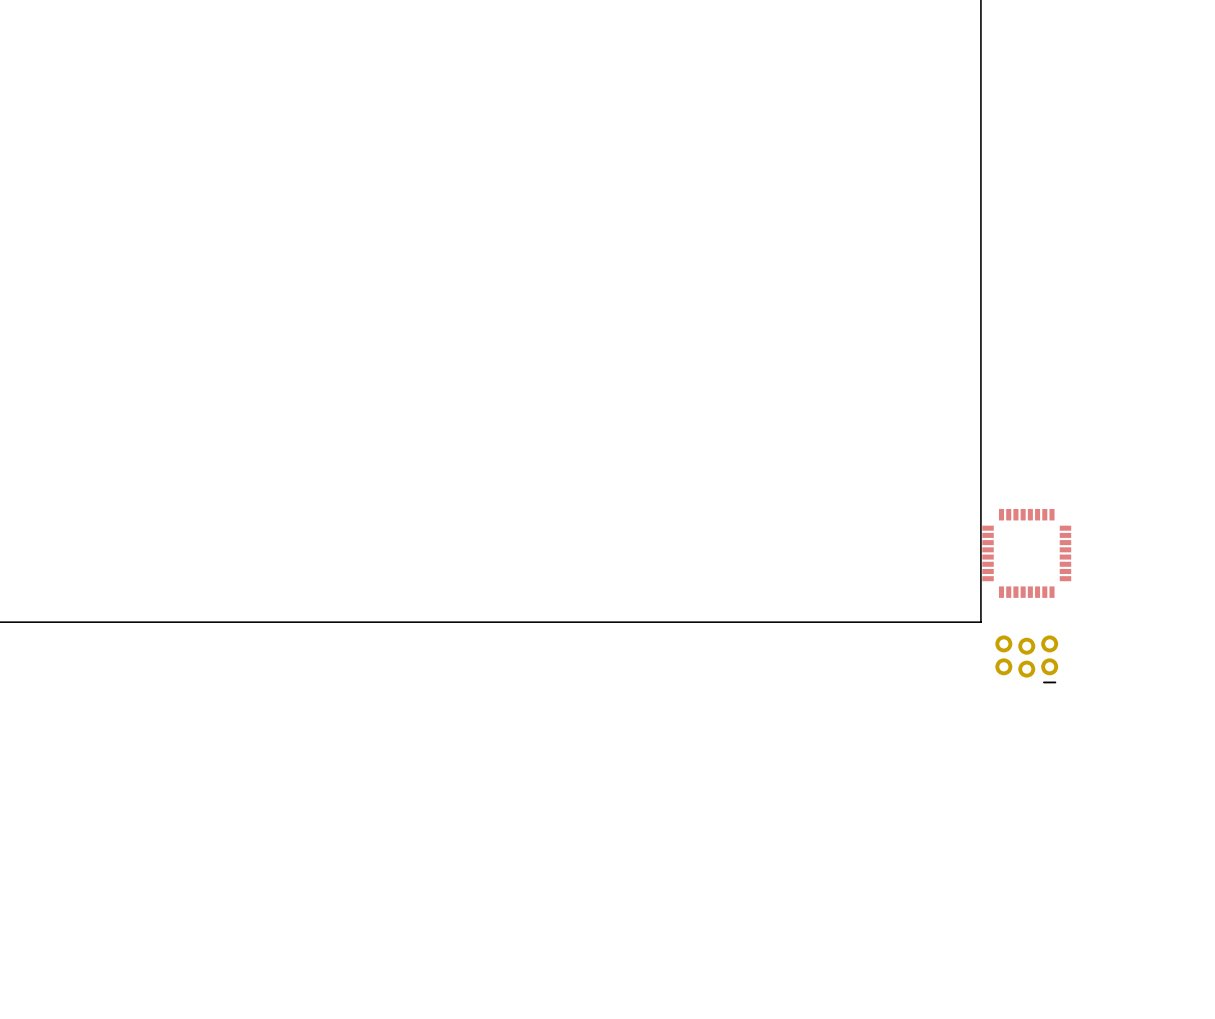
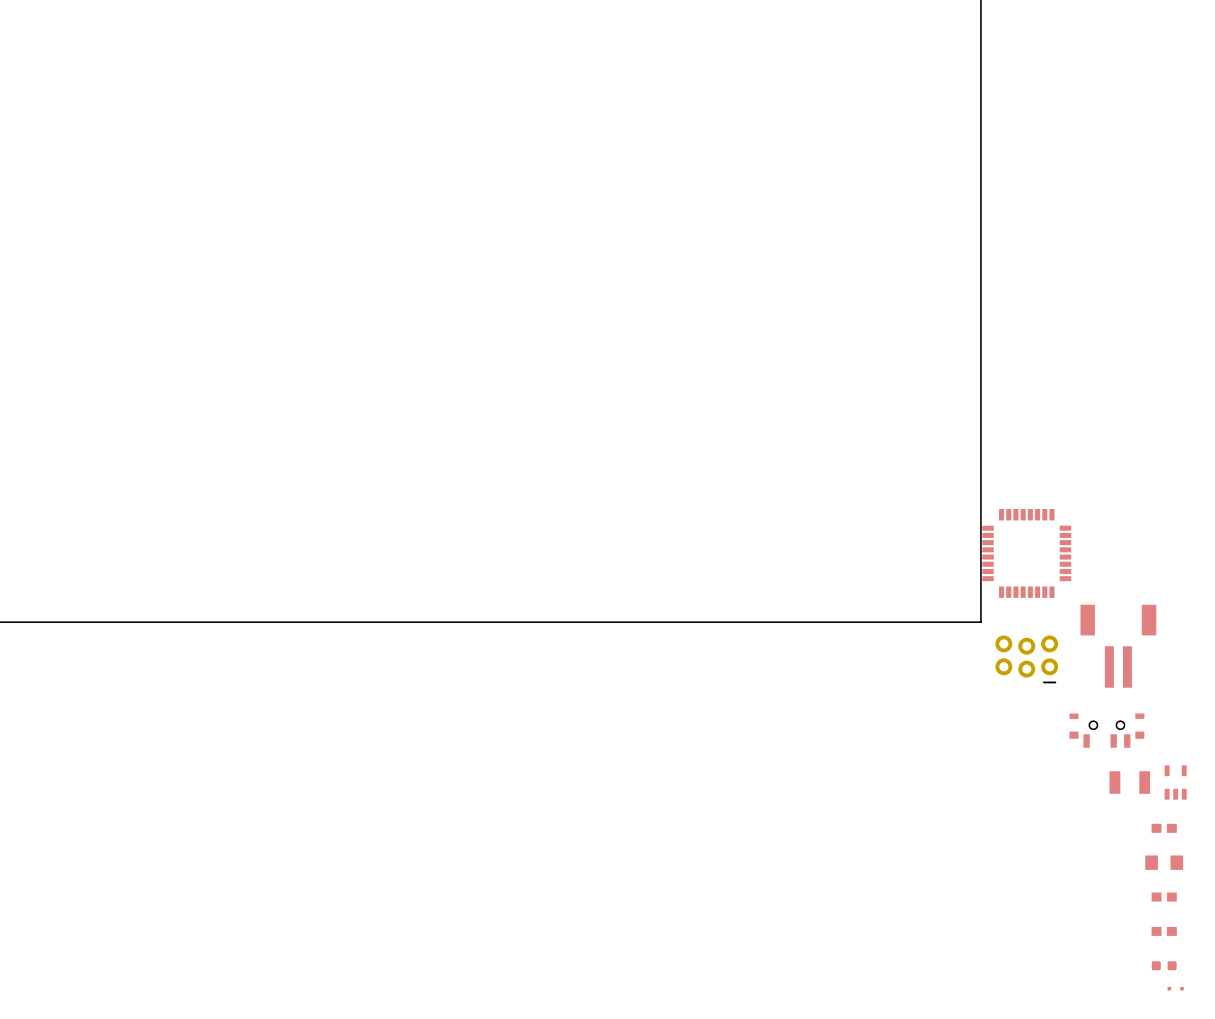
part: none -> (1118, 646)
part: none -> (1106, 730)
part: none -> (1129, 782)
part: none -> (1175, 782)
part: none -> (1164, 828)
part: none -> (1164, 862)
part: none -> (1164, 897)
part: none -> (1164, 931)
part: none -> (1164, 965)
part: none -> (1175, 988)

